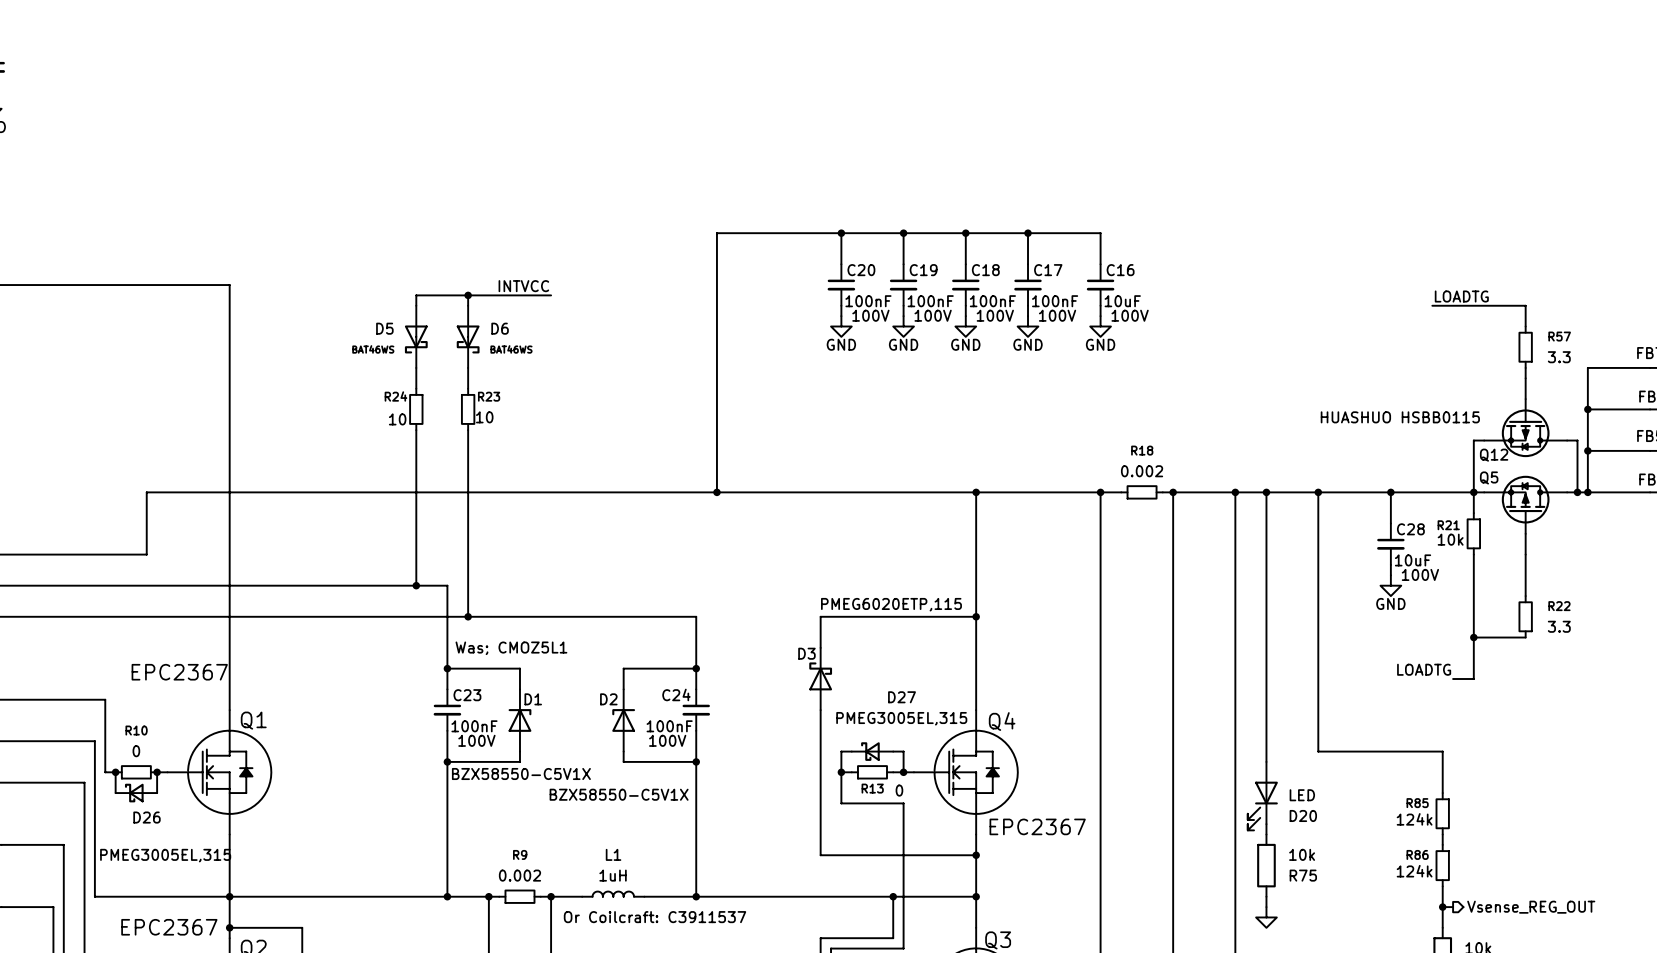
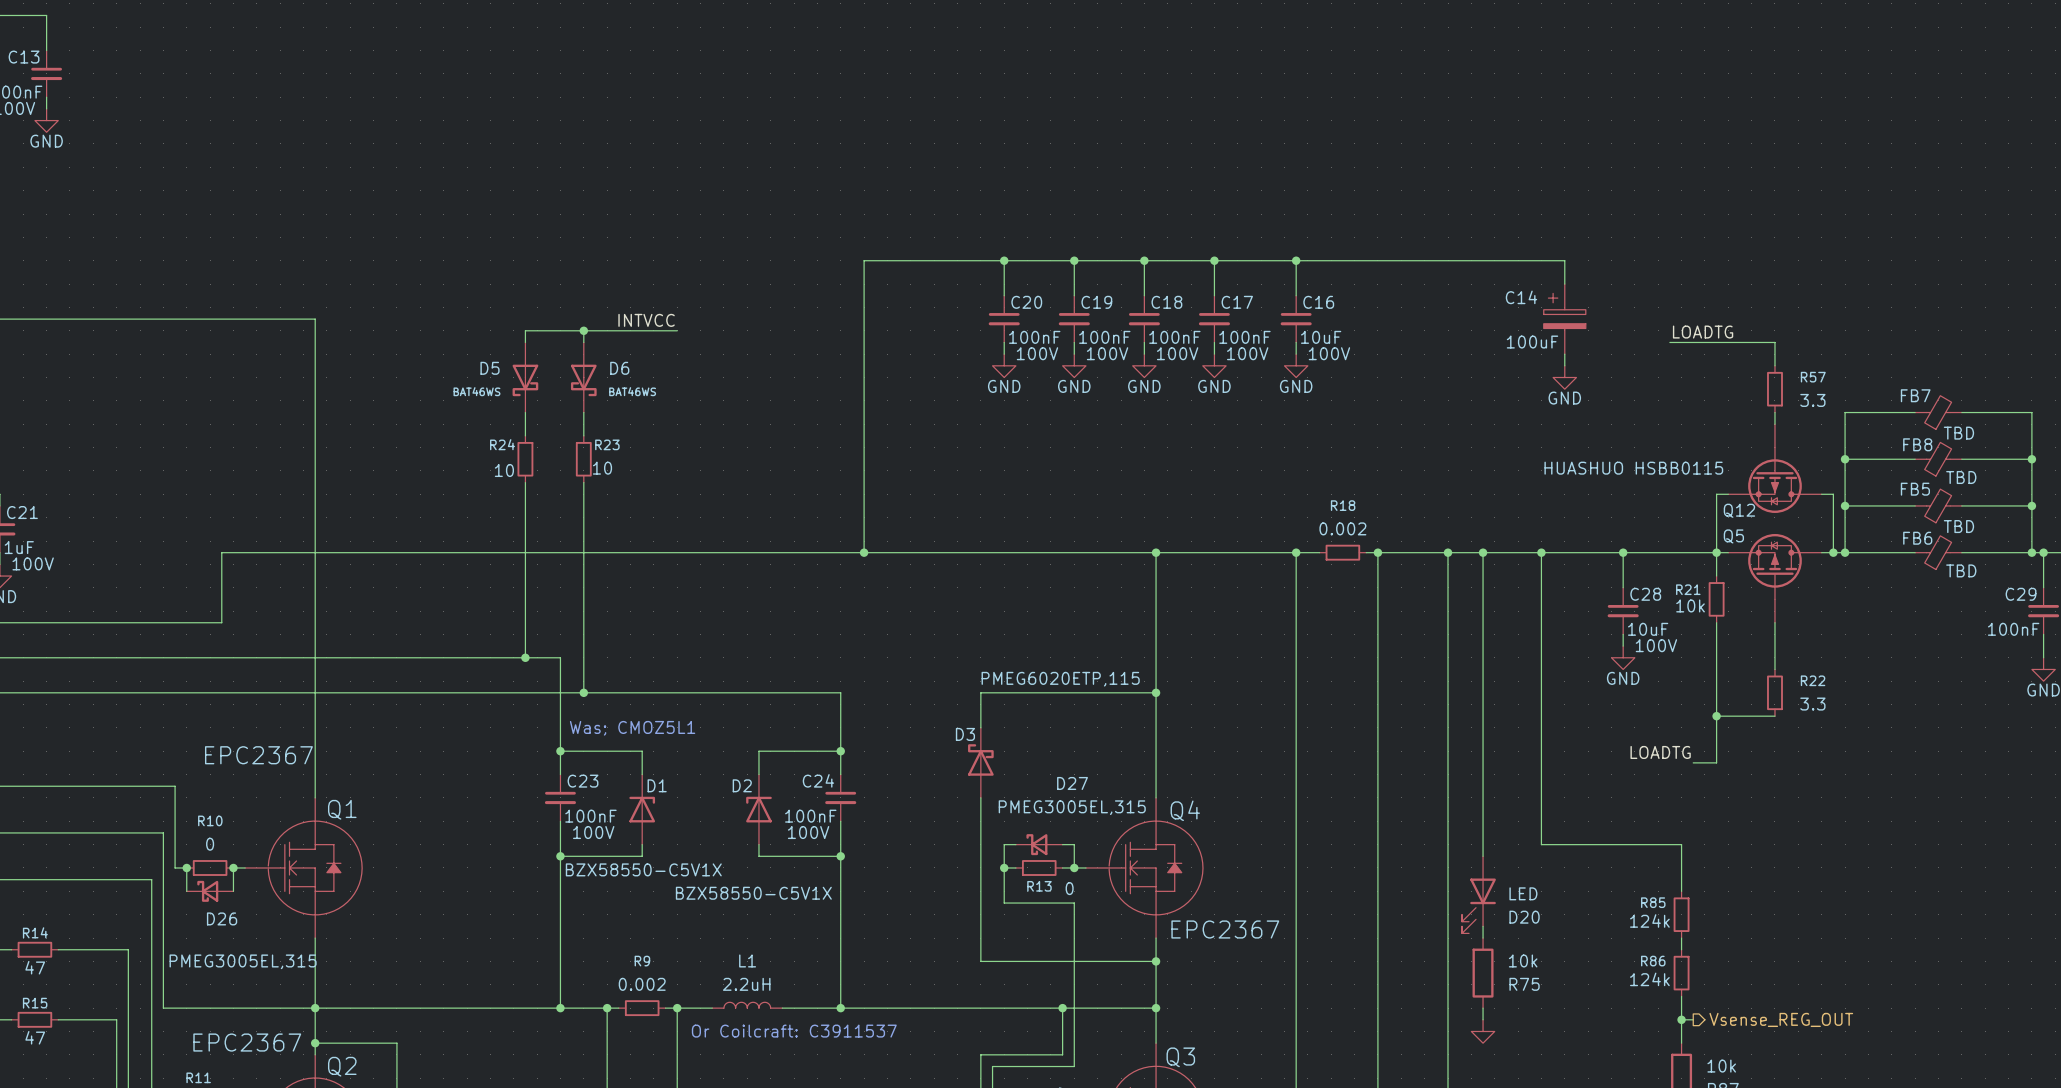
wire: none -> (1296, 260) (1564, 260) (1564, 284)
junction: none -> (1296, 260)
C14: none -> 100uF (1564, 319)
wire: none -> (1564, 354) (1564, 365)
power symbol: none -> GND (1564, 377)
L1 value: 1uH (613, 875) -> 2.2uH (746, 984)

